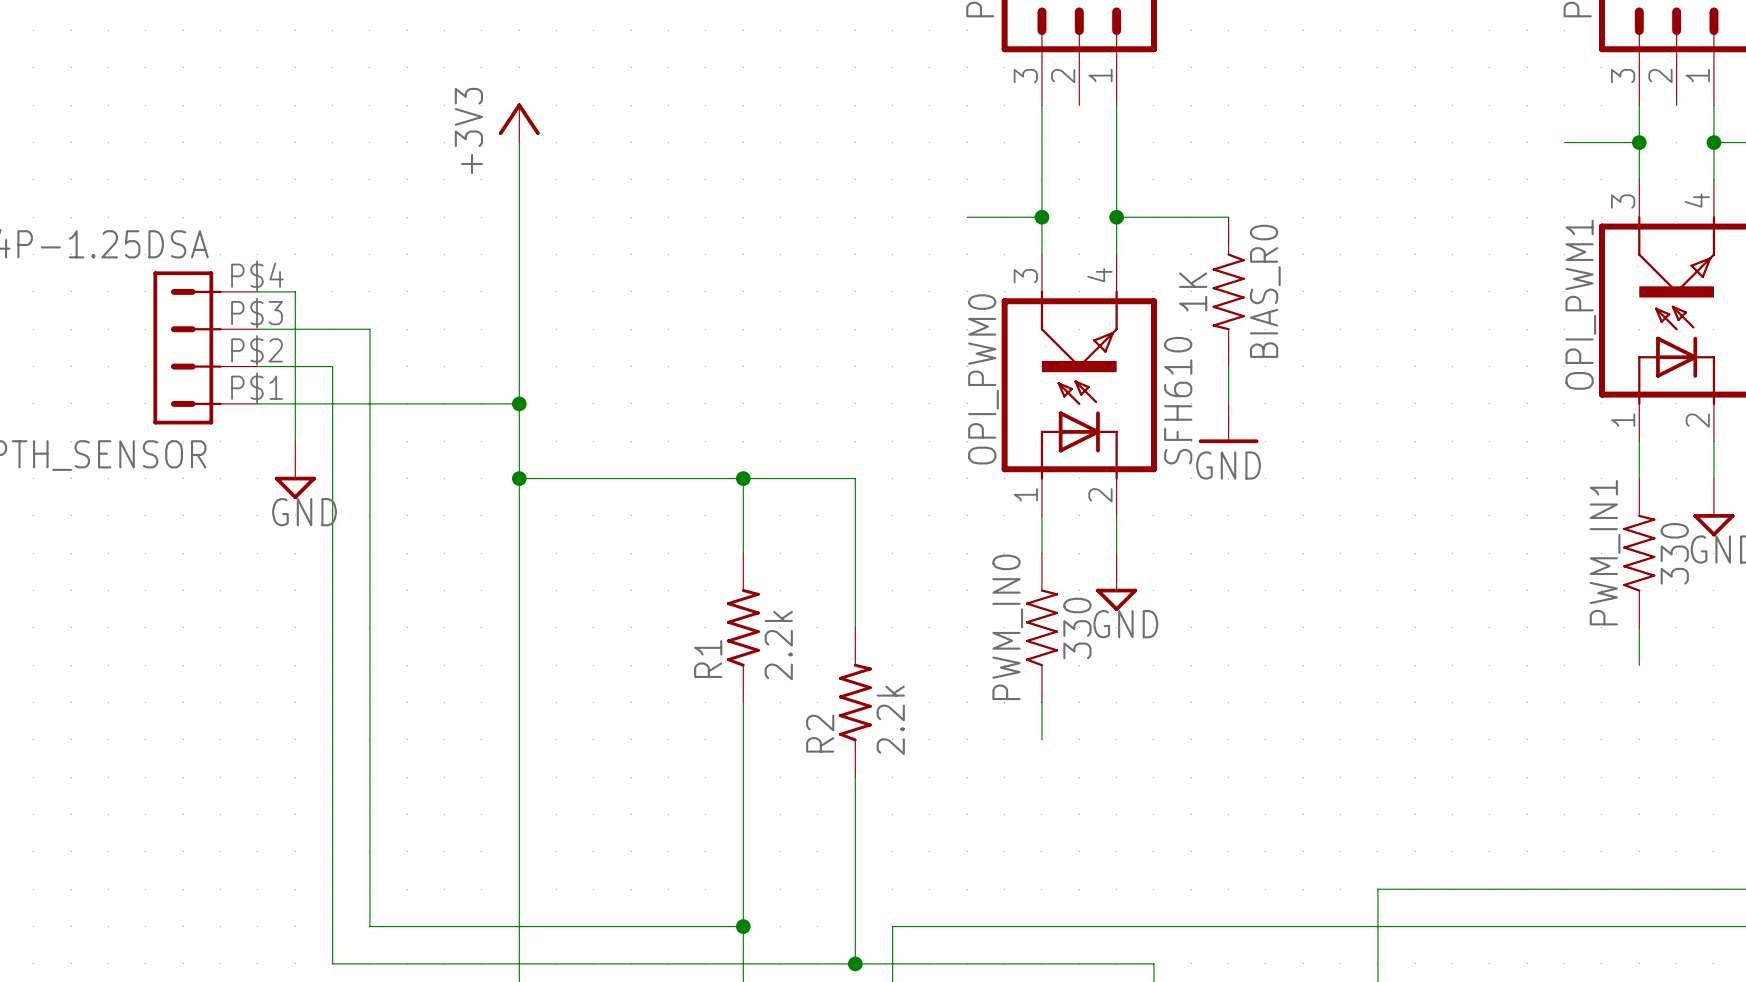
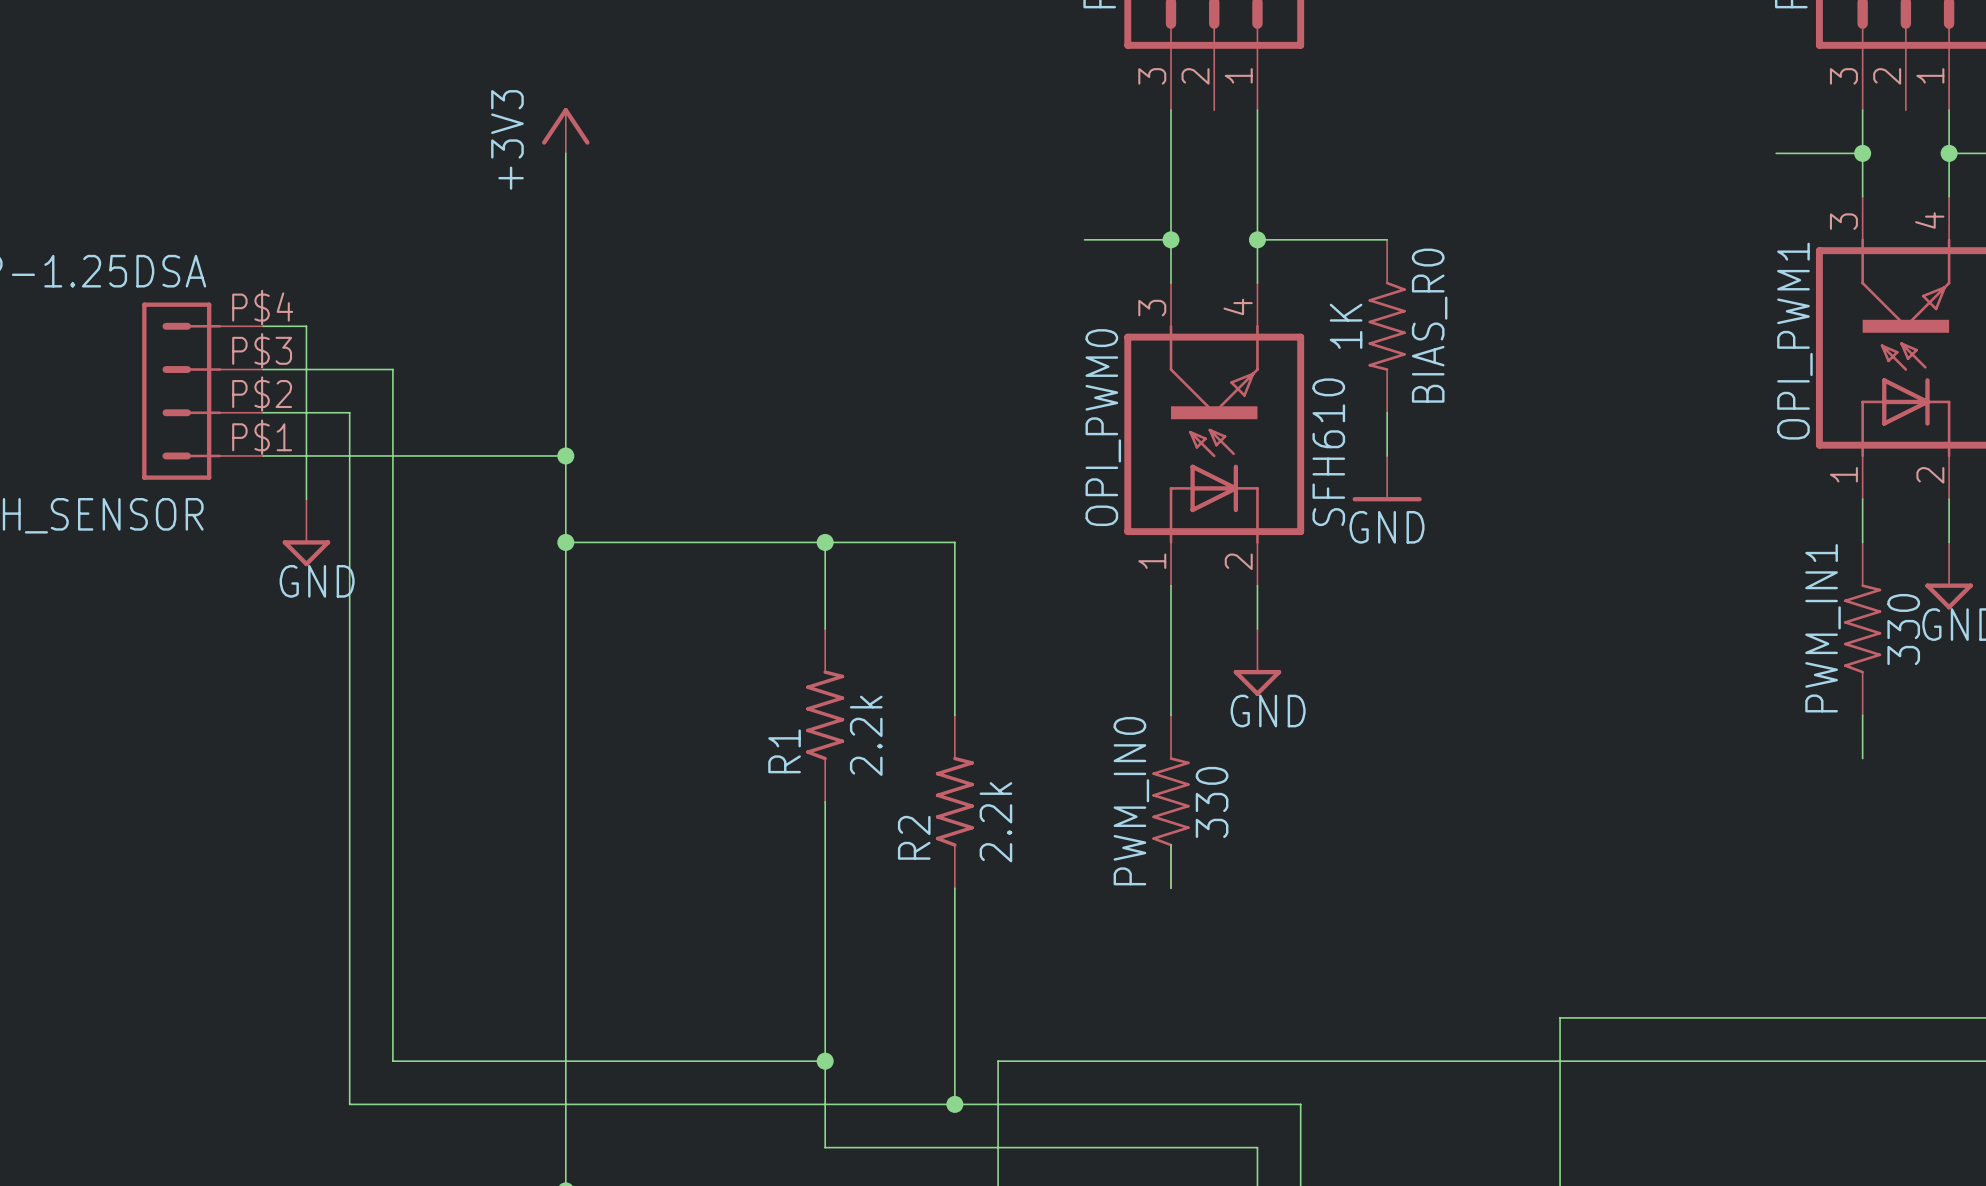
PWM_IN0 position: (1041, 627) -> (1171, 801)
wire: (1041, 702) (1041, 739) -> (1171, 888) (1171, 845)

